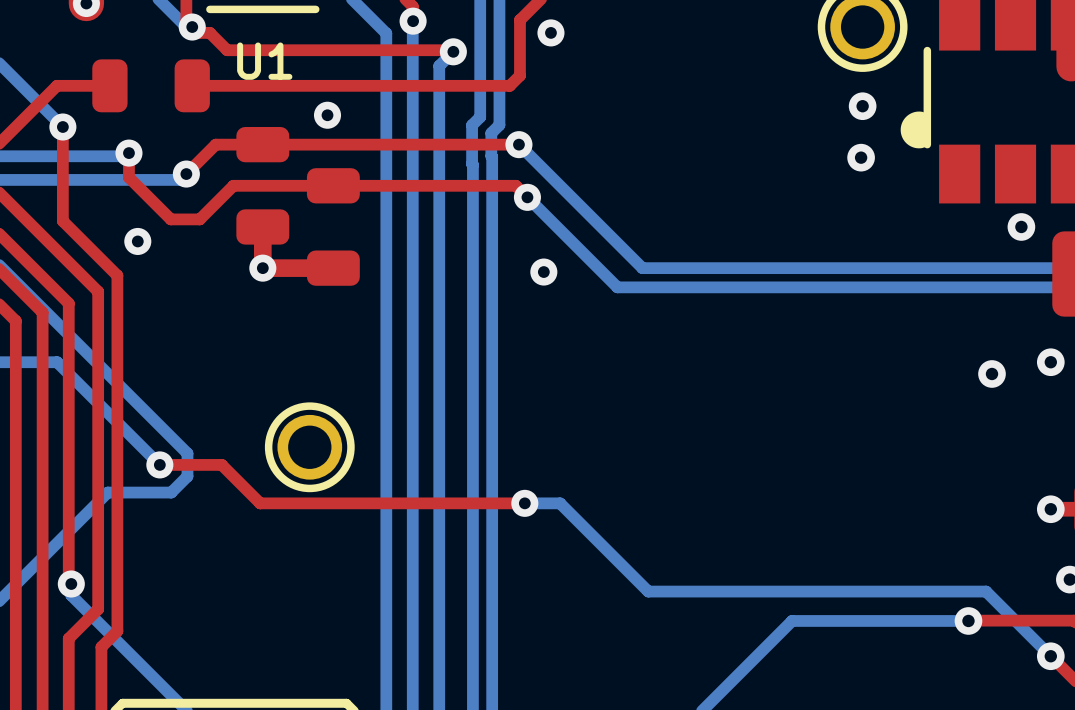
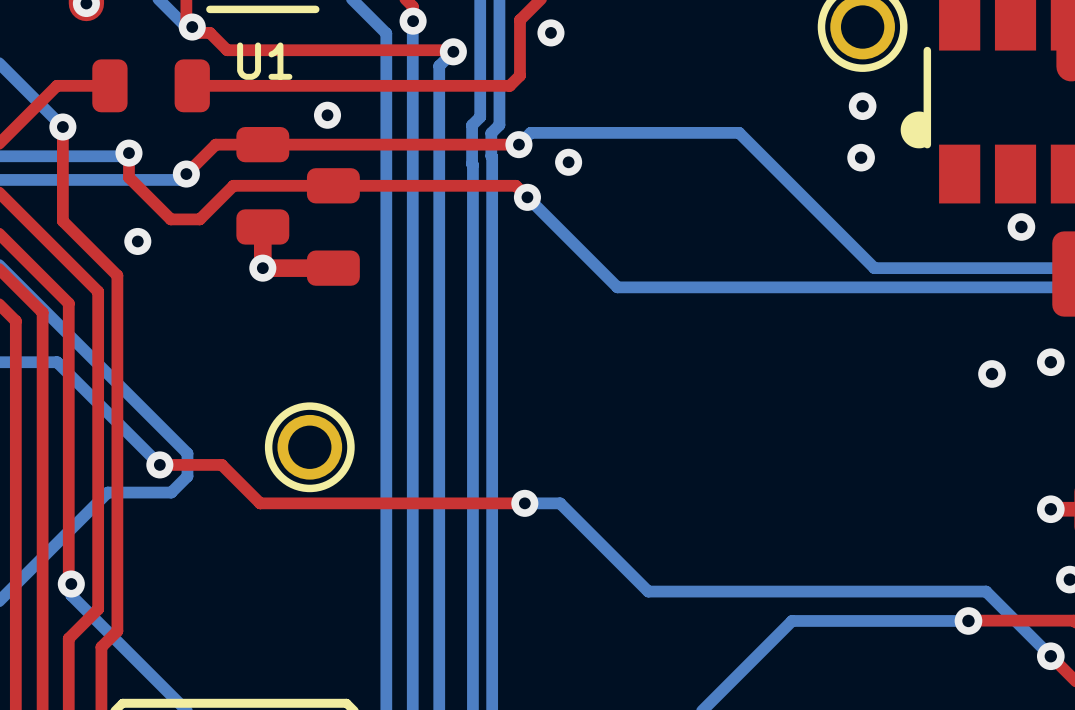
bottom track: (518, 144) (642, 268) (874, 268) -> (518, 144) (530, 132) (739, 132) (874, 268)
via: none -> (568, 162)
via: (543, 272) -> none

